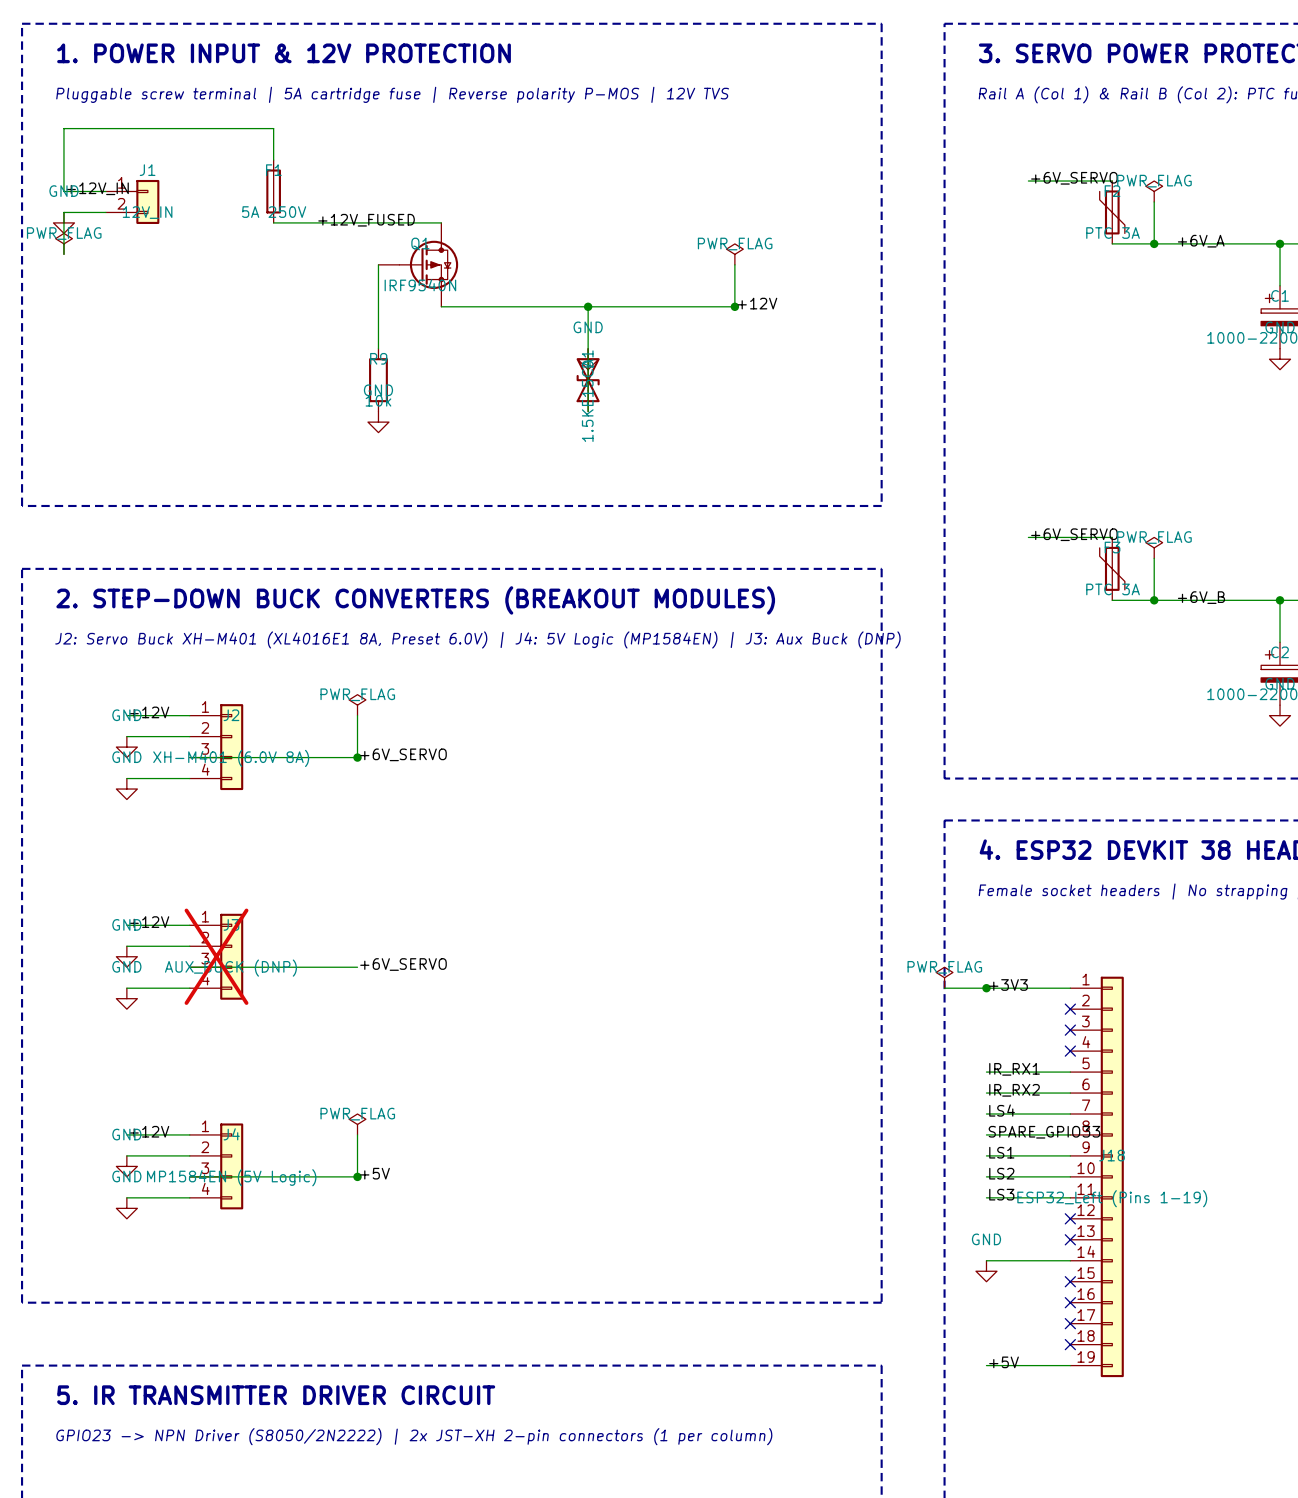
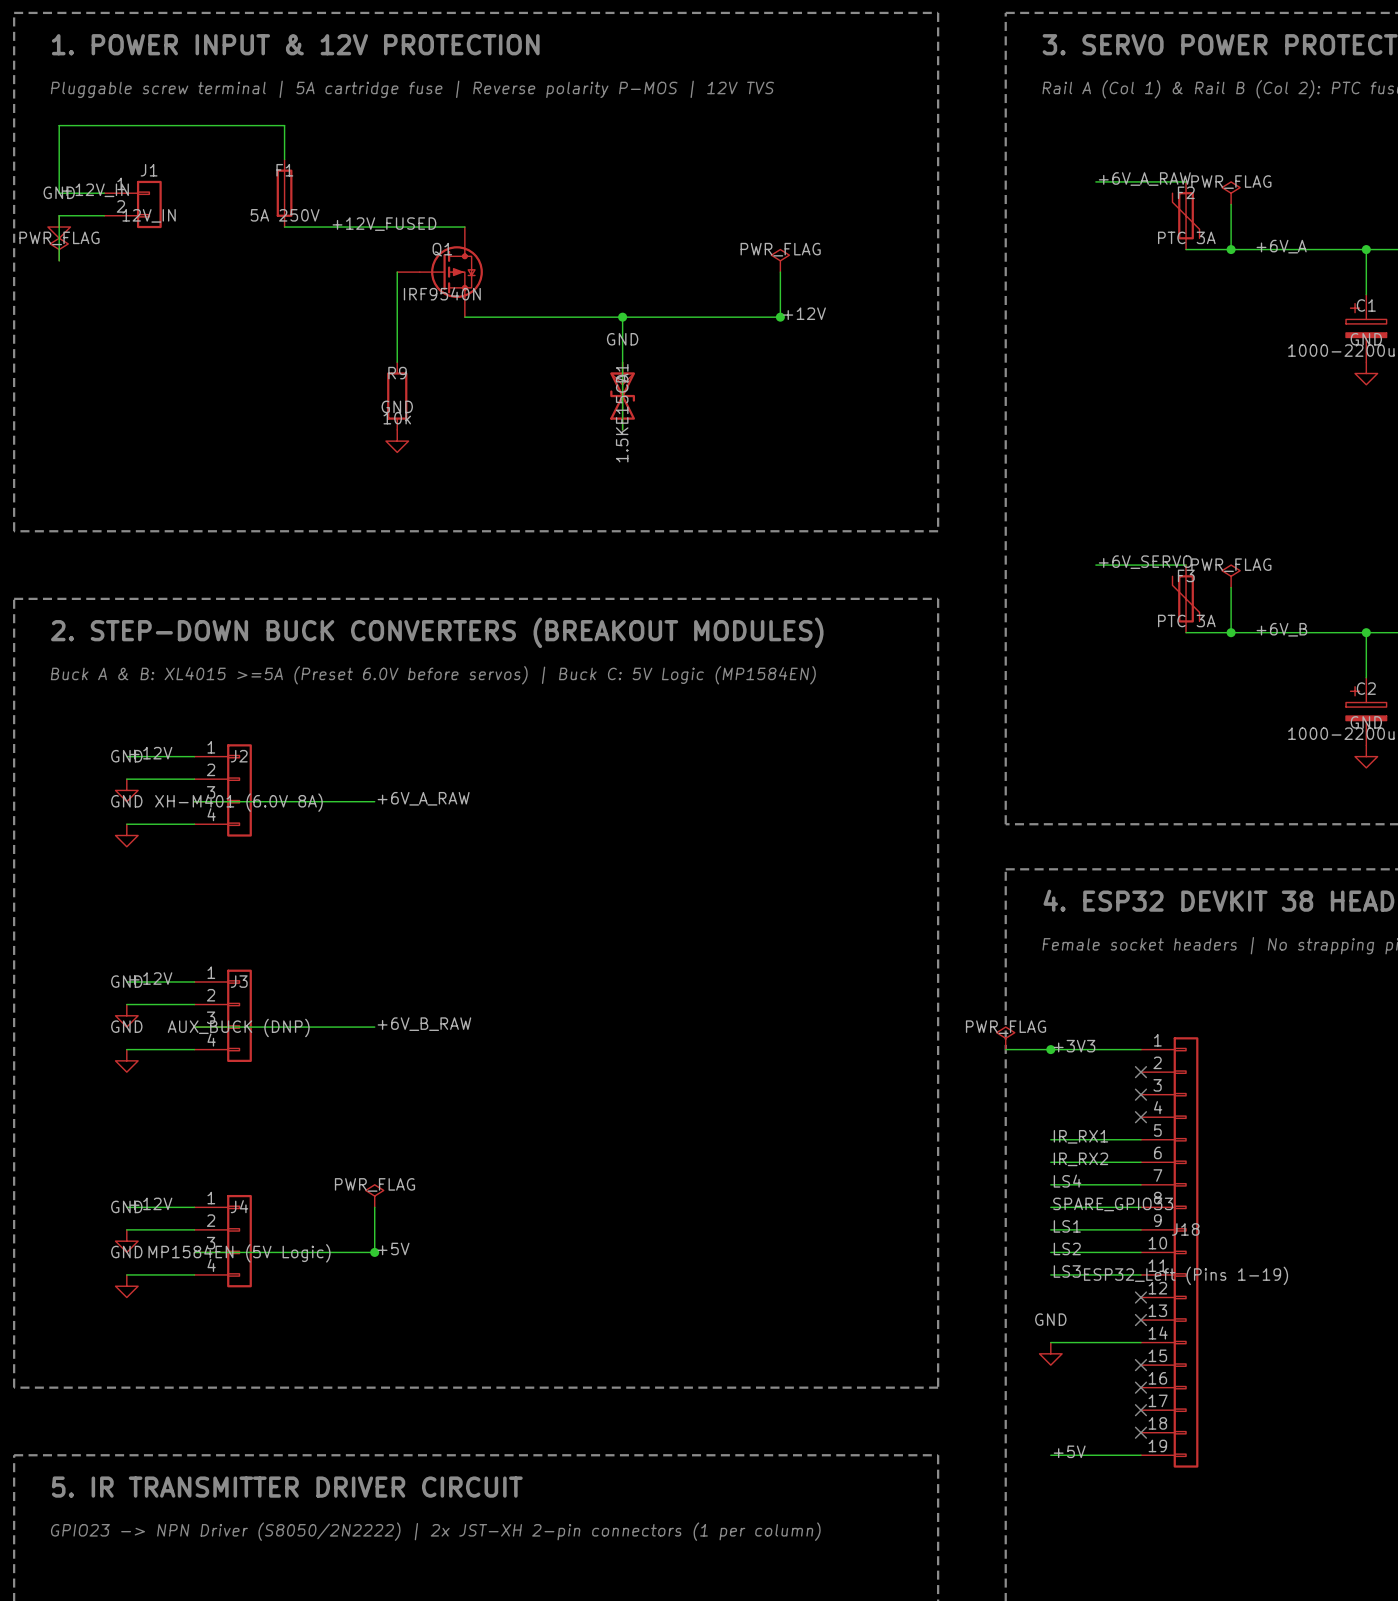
label: +6V_SERVO (1074, 178) -> +6V_A_RAW (1144, 179)
text: J2: Servo Buck XH-M401 (XL4016E1 8A, Preset 6.0V) | J4: 5V Logic (MP1584EN) | J3: Aux Buck (DNP) (477, 639) -> Buck A & B: XL4015 >=5A (Preset 6.0V before servos) | Buck C: 5V Logic (MP1584EN) (433, 675)
power symbol: PWR_FLAG (357, 705) -> none
wire: (357, 715) (357, 757) -> none
label: +6V_SERVO (403, 754) -> +6V_A_RAW (423, 798)
junction: (357, 757) -> none
J3 do-not-place cross: (216, 956) -> none
label: +6V_SERVO (403, 964) -> +6V_B_RAW (424, 1024)

